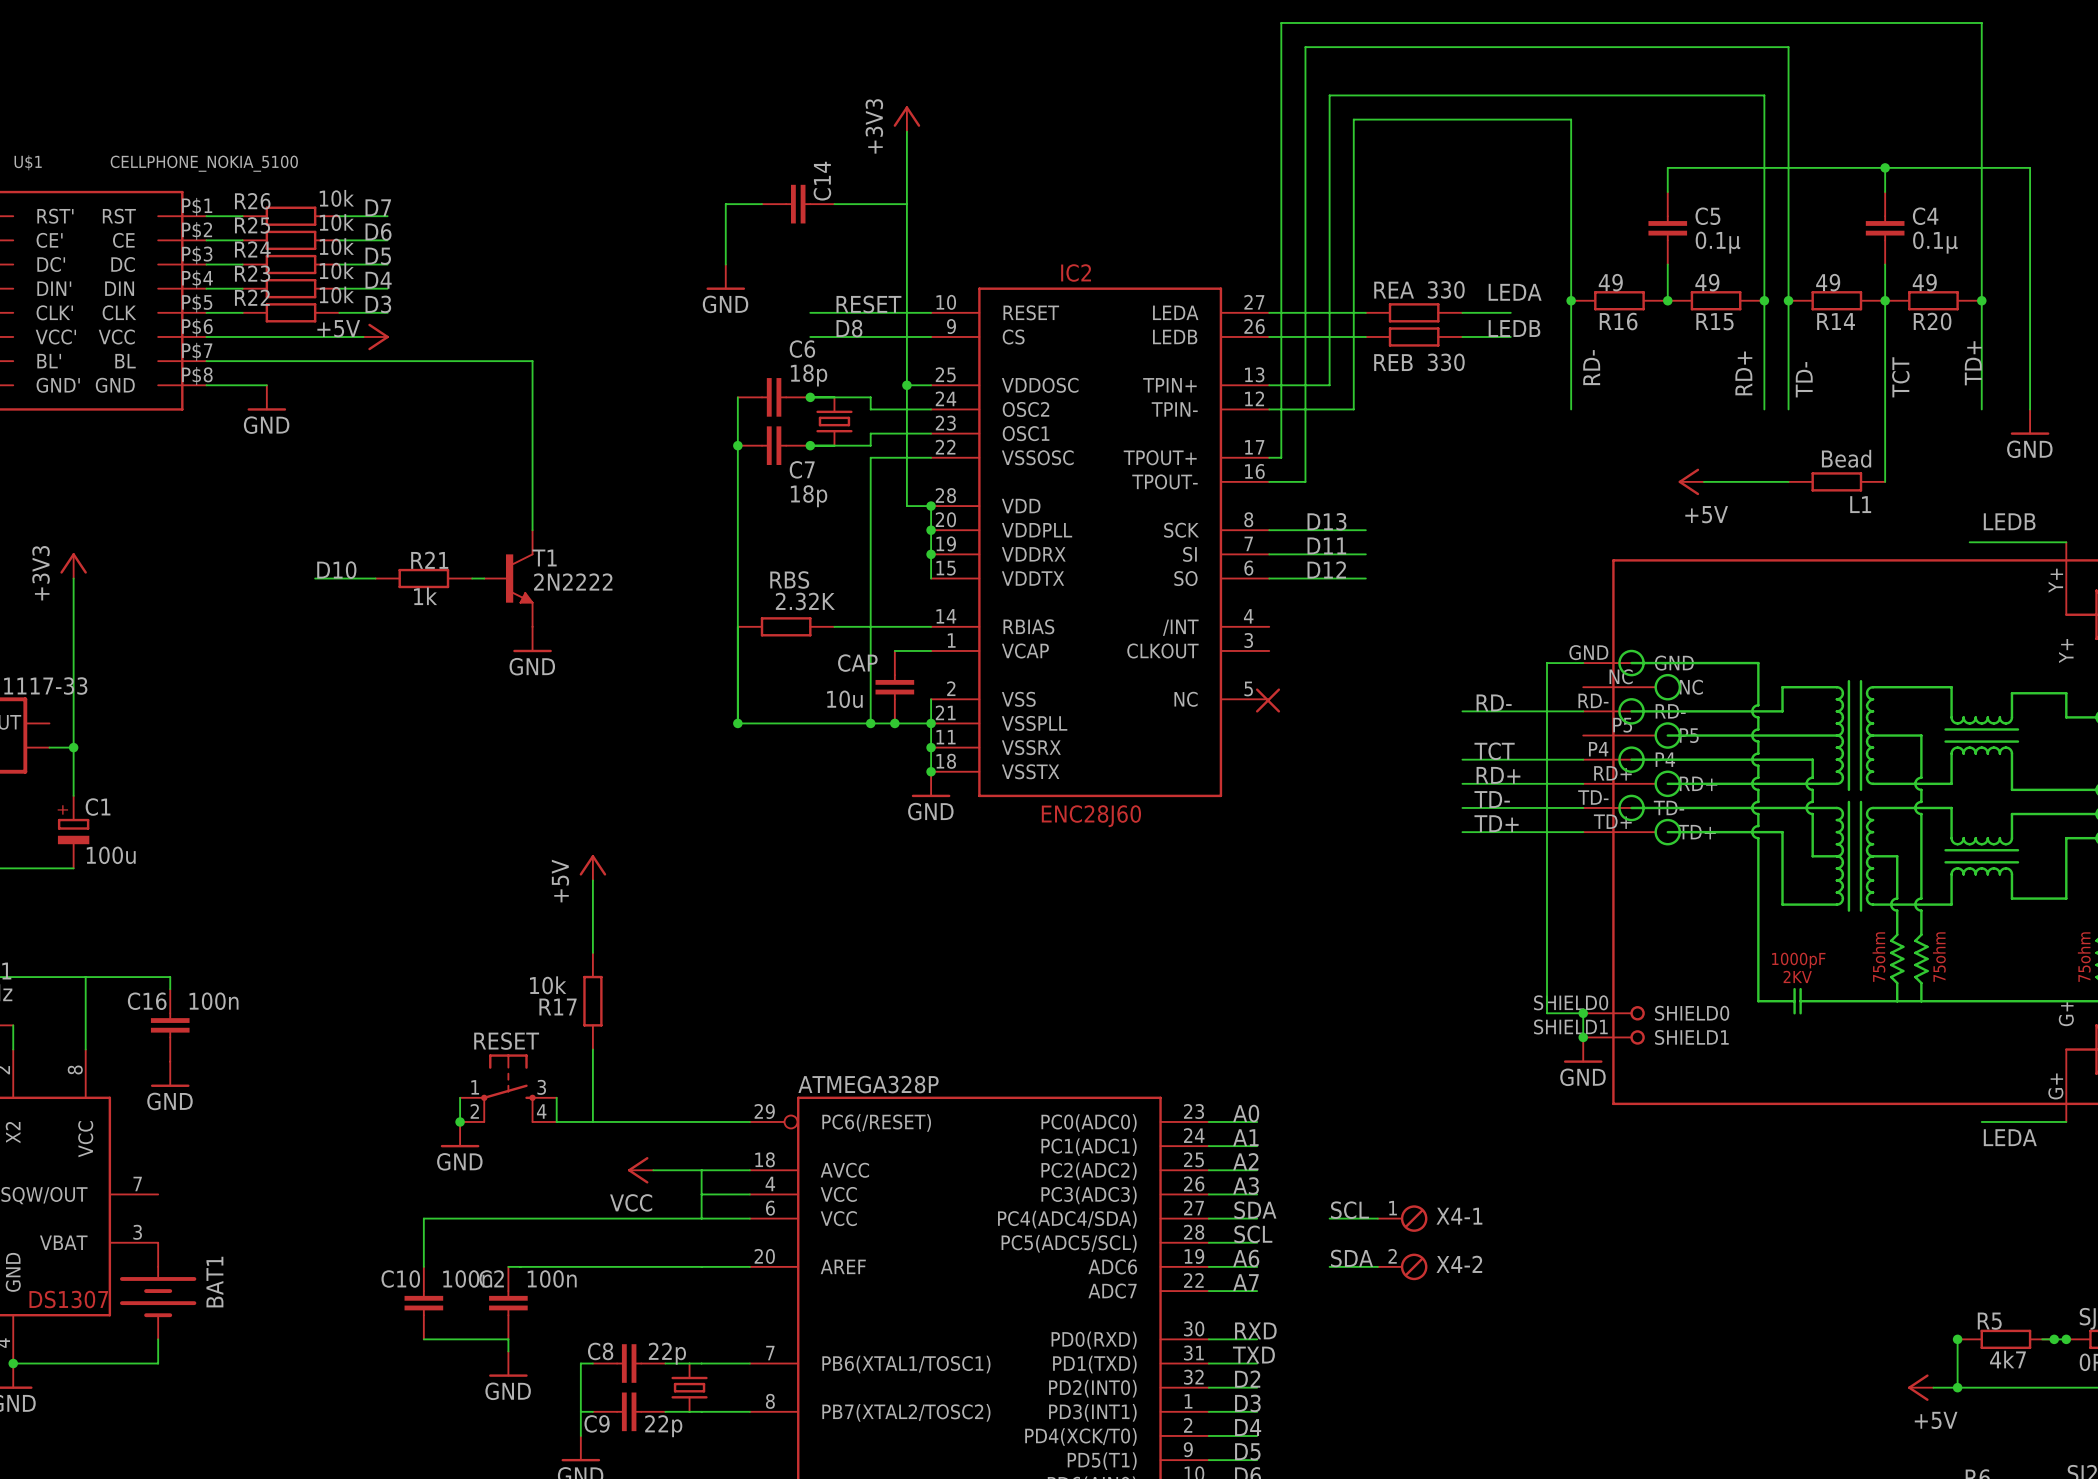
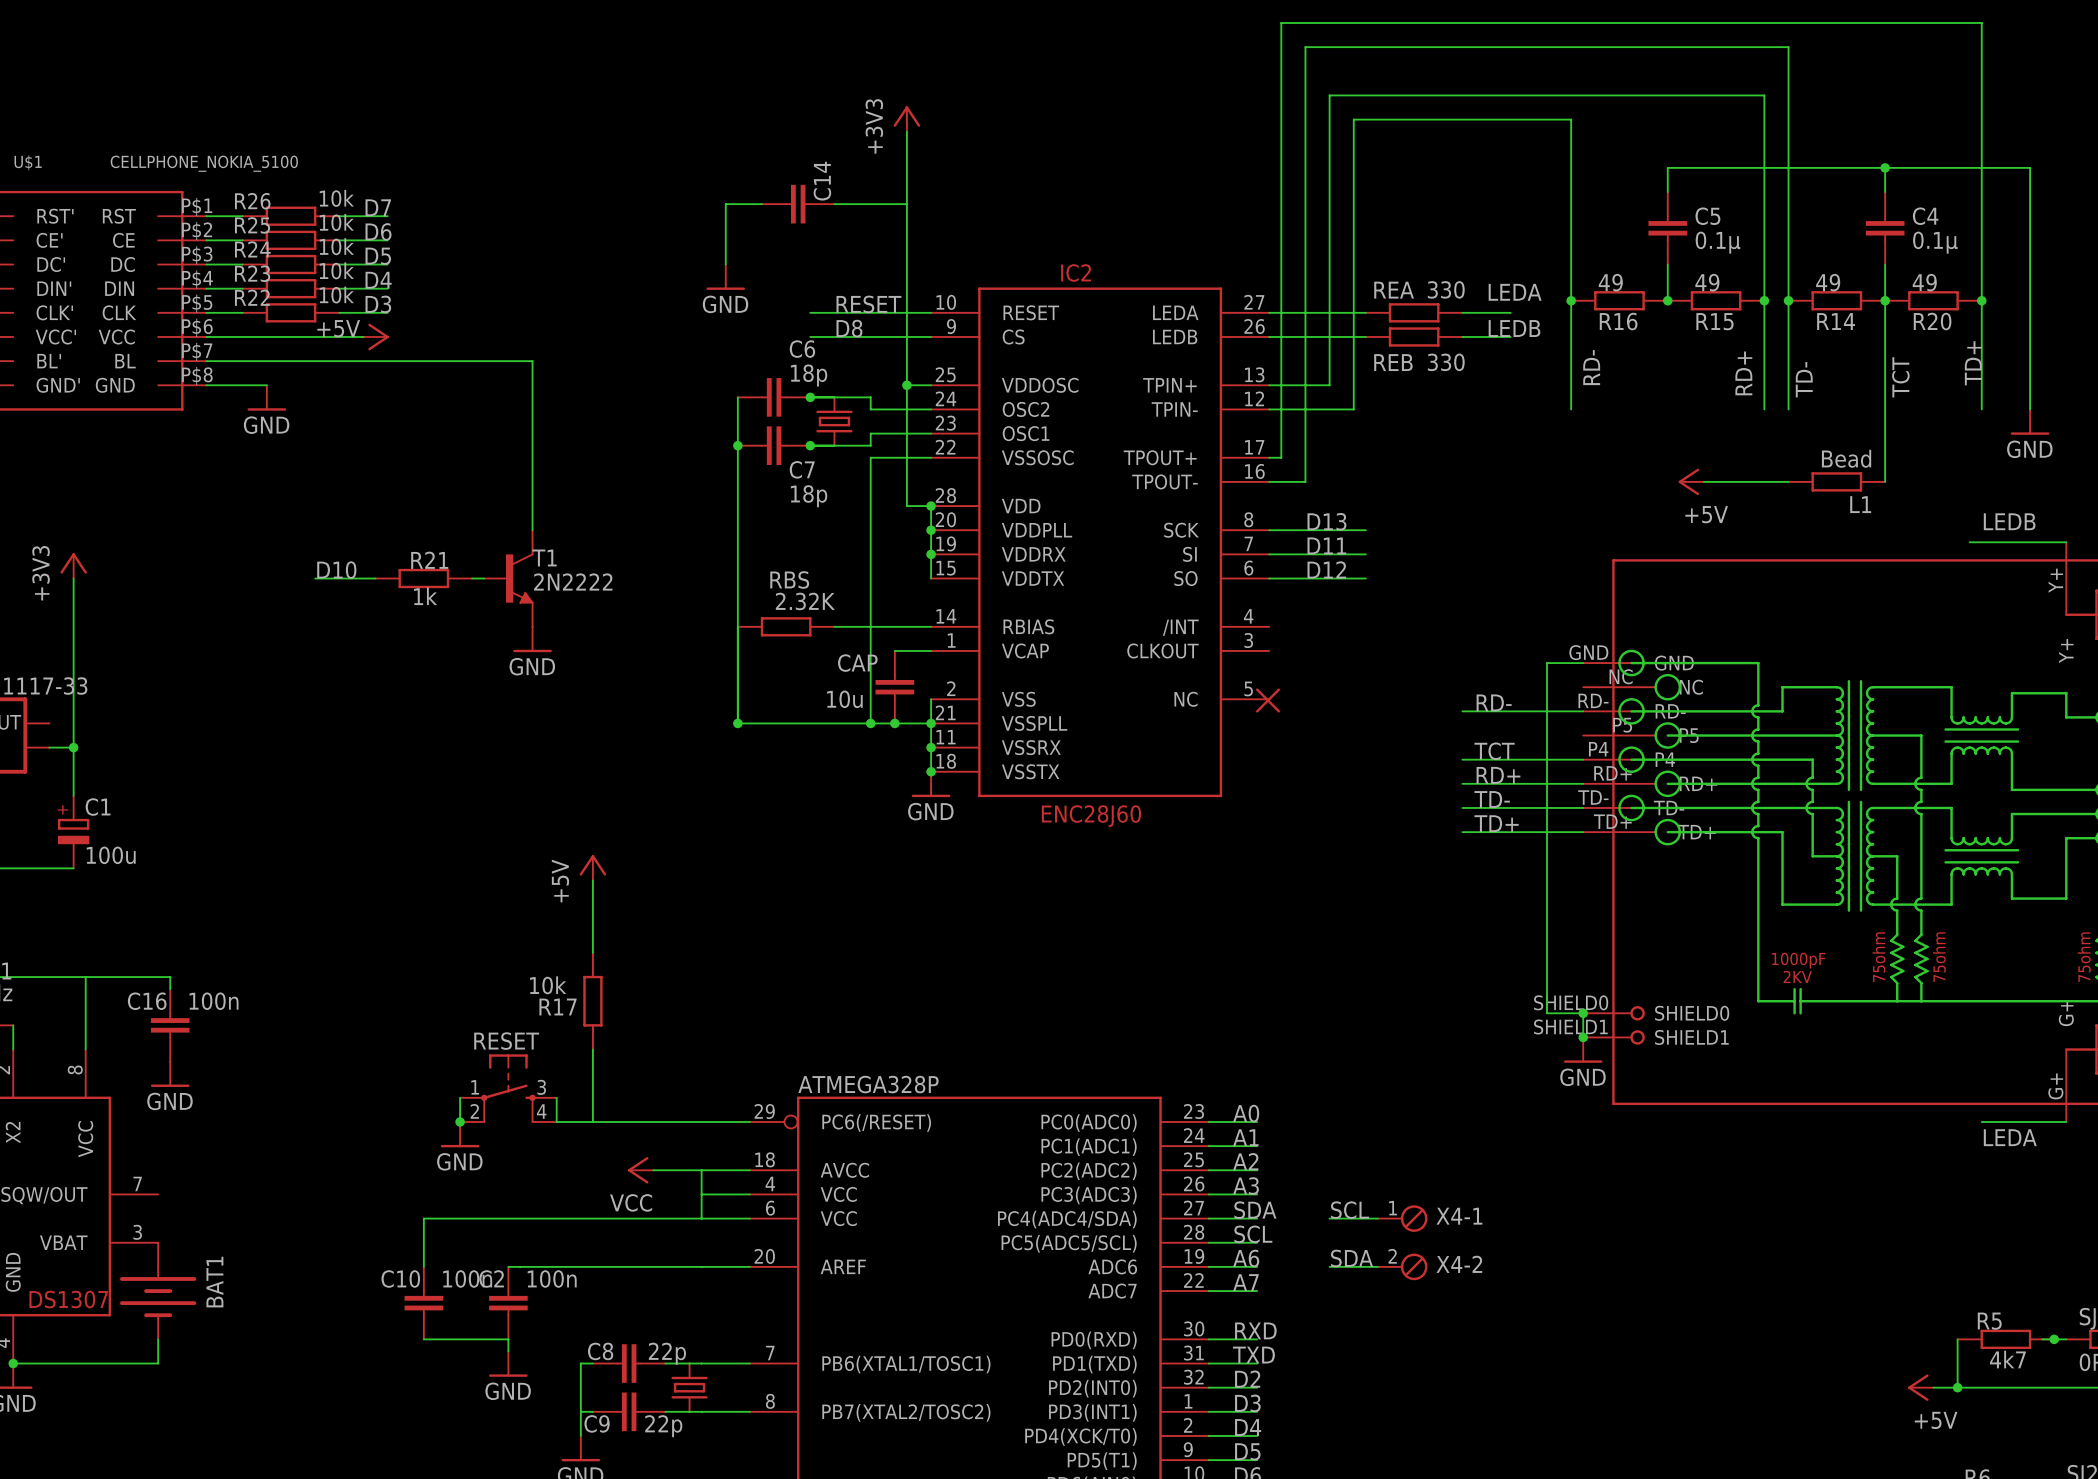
junction: (1957, 1339) -> none
junction: (2066, 1339) -> none

